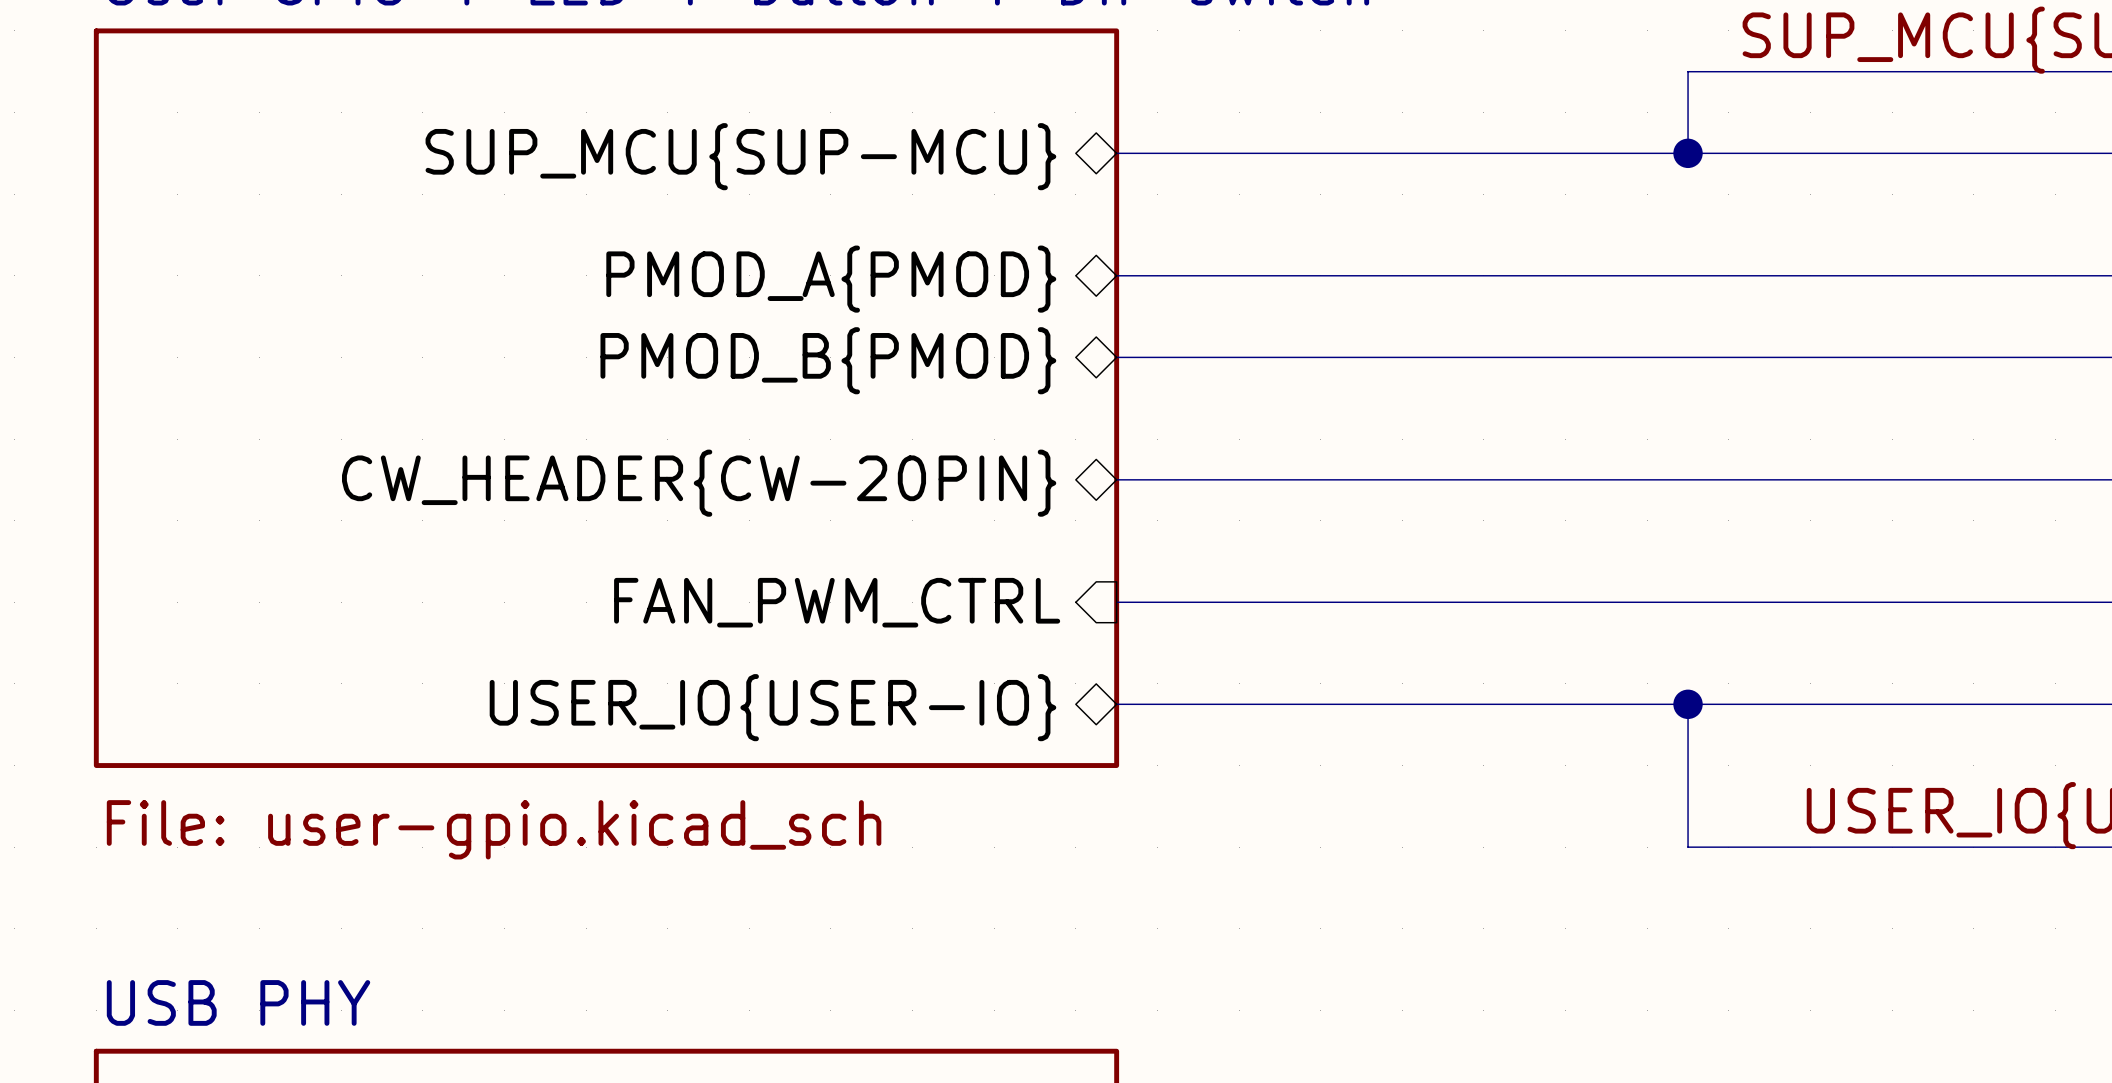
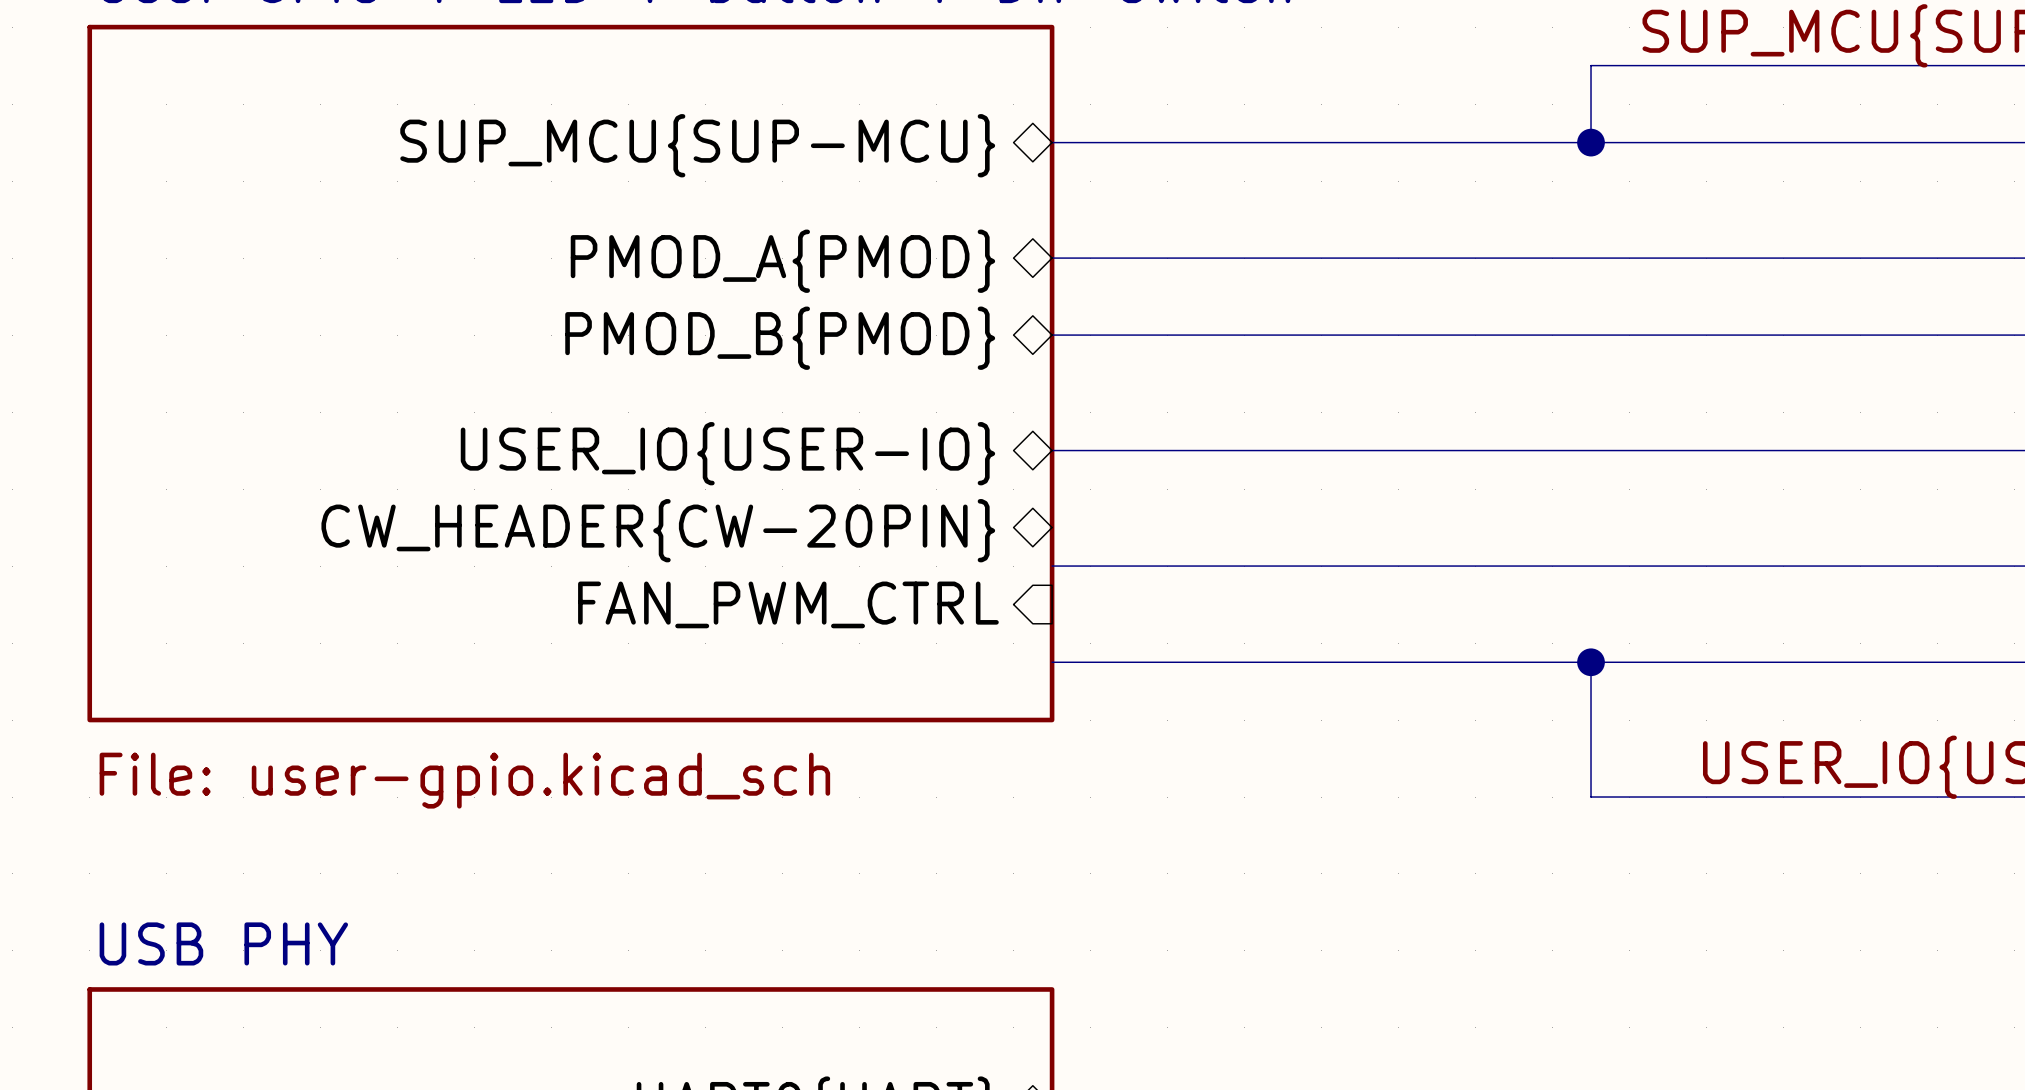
sheet pin: CW_HEADER{CW-20PIN} (699, 483) -> USER_IO{USER-IO} (727, 453)
sheet pin: none -> CW_HEADER{CW-20PIN} (658, 530)
sheet pin position: FAN_PWM_CTRL (837, 602) -> FAN_PWM_CTRL (788, 604)
sheet pin: USER_IO{USER-IO} (772, 707) -> none

